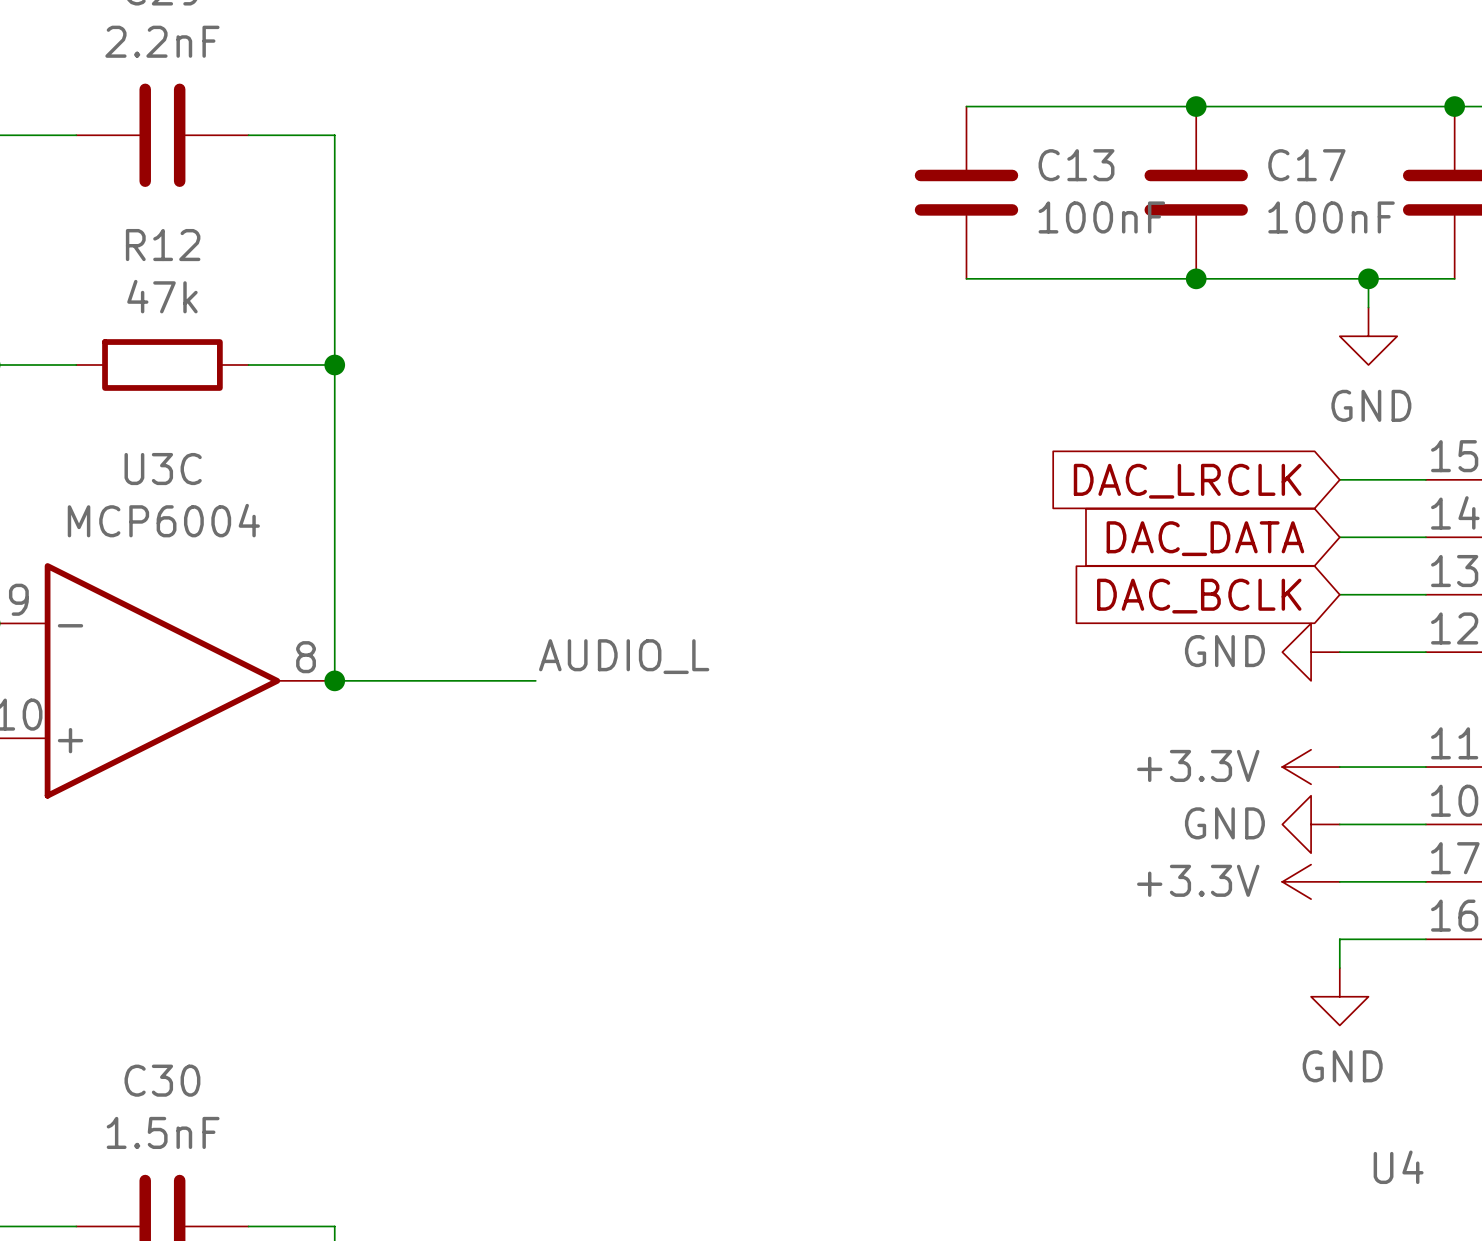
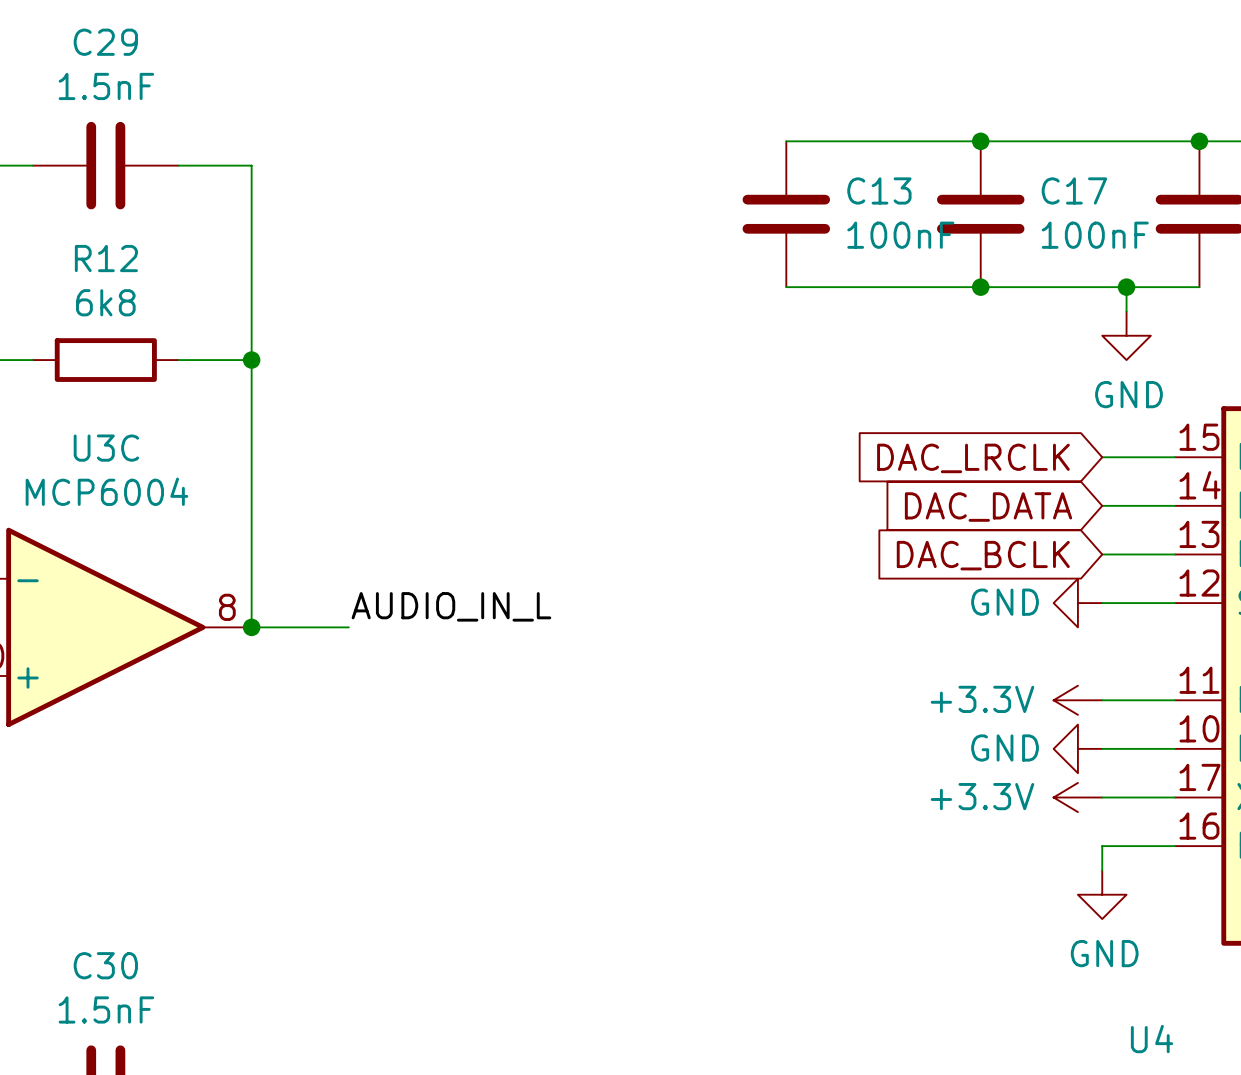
C29 value: 2.2nF (162, 41) -> 1.5nF (106, 86)
R12 value: 47k (162, 296) -> 6k8 (105, 302)
label: AUDIO_L (624, 656) -> AUDIO_IN_L (451, 606)
wire: (449, 680) (535, 680) -> none

